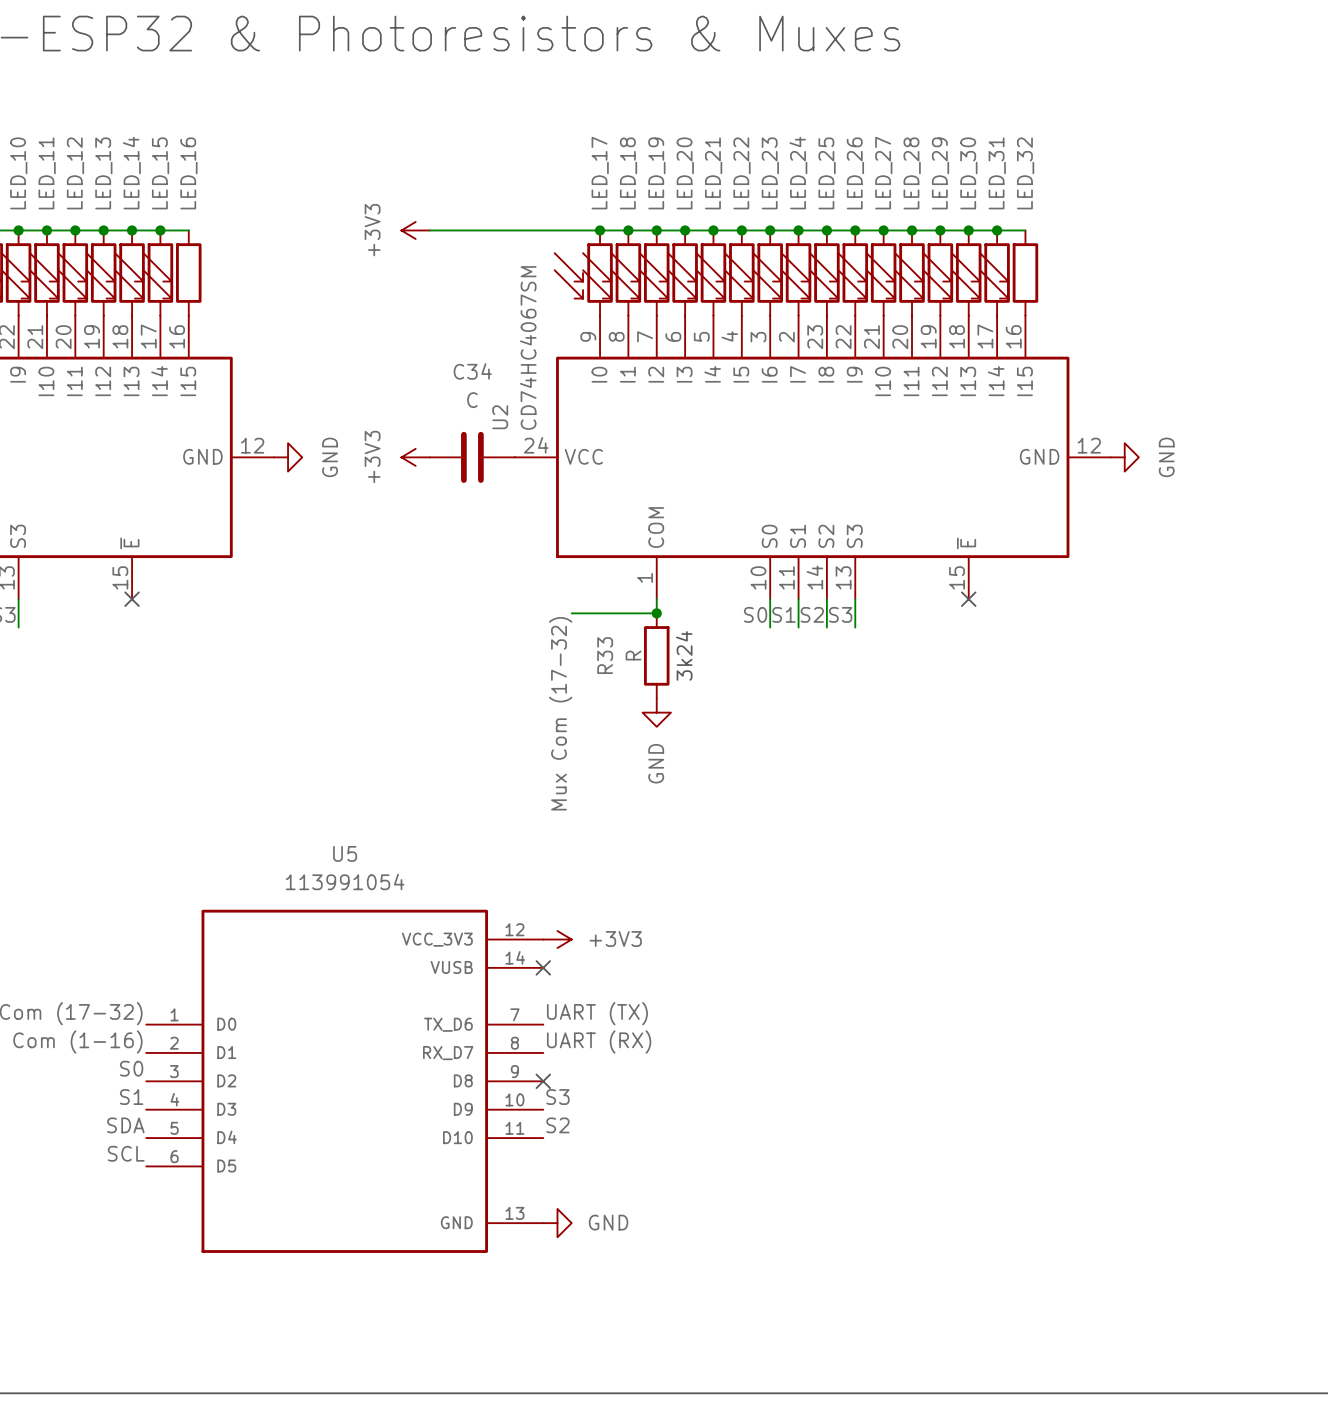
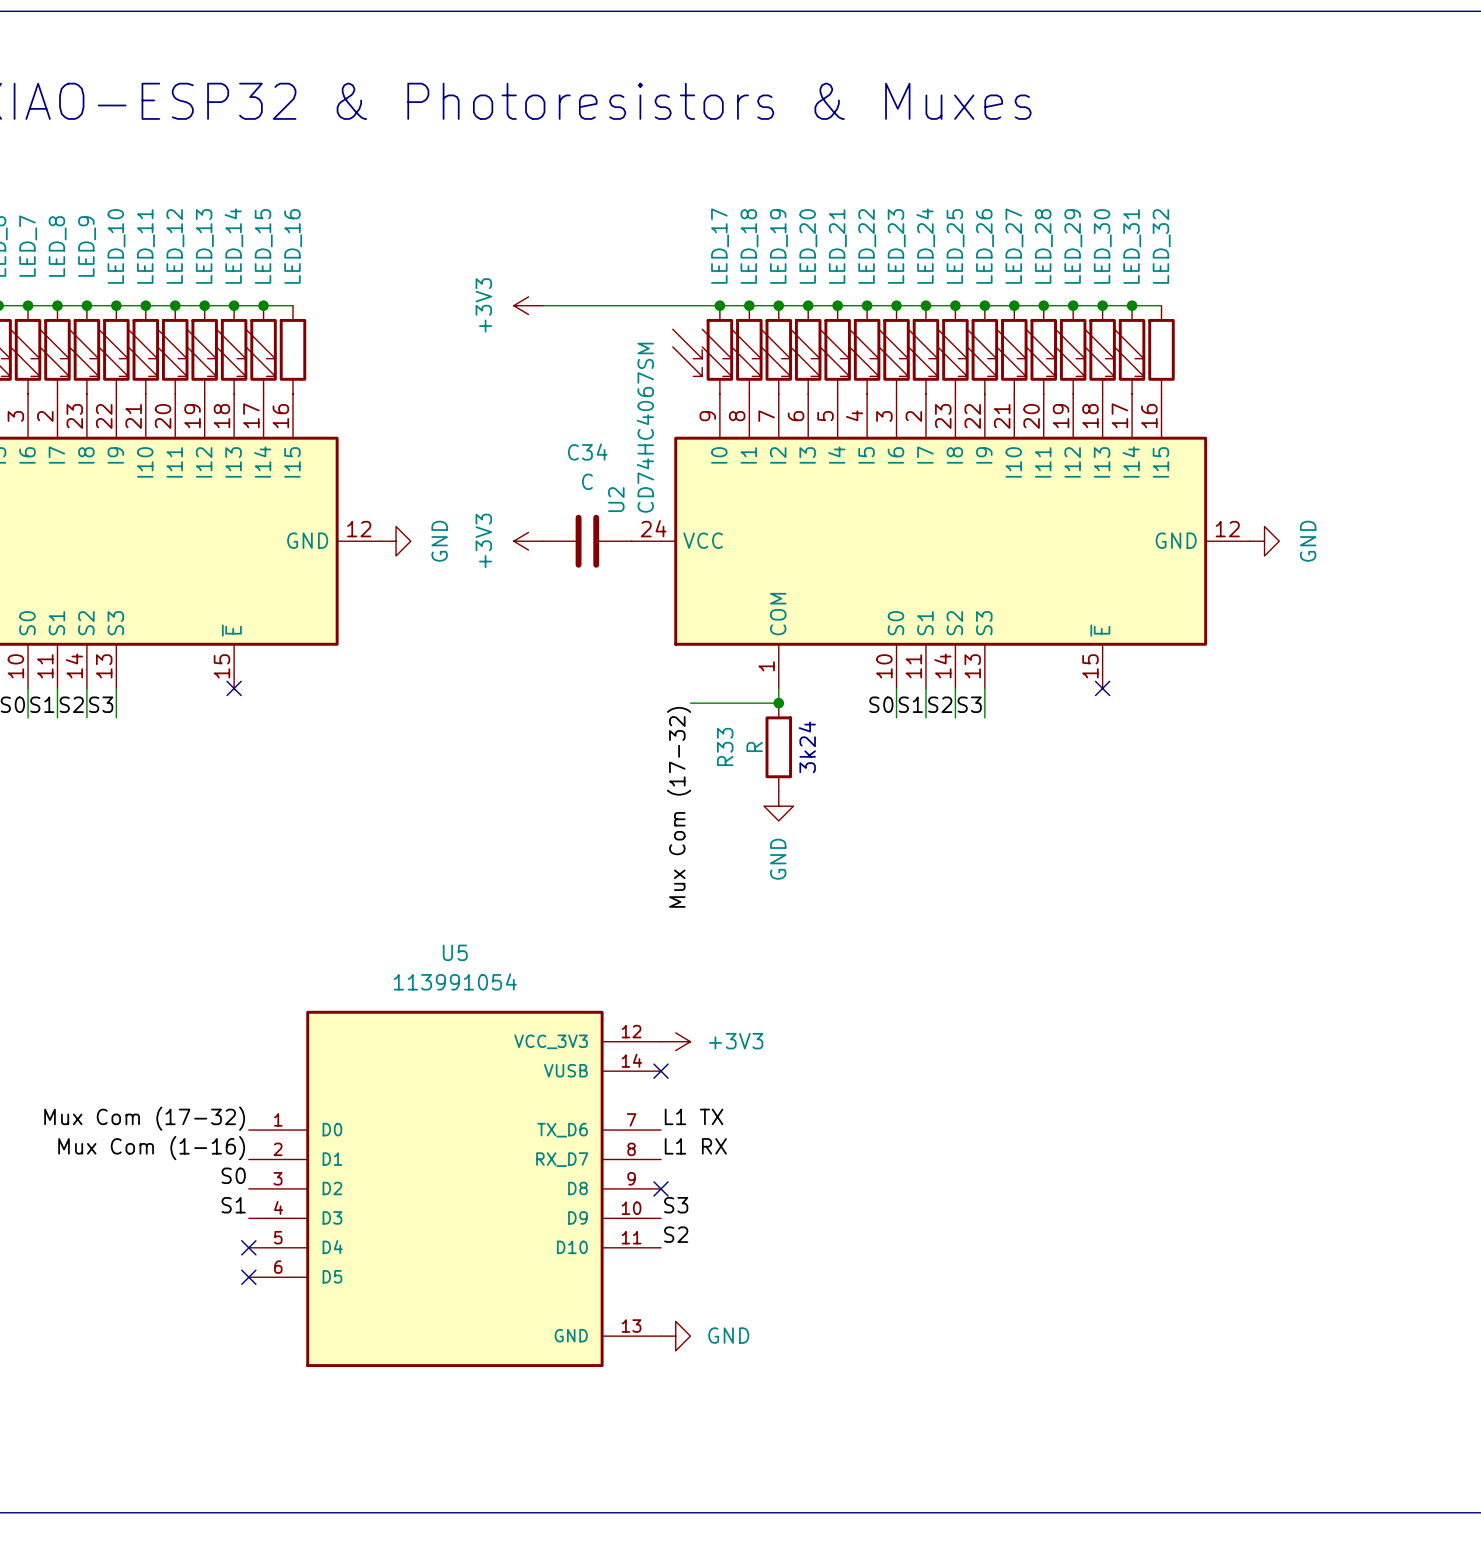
label: UART (TX) (597, 1013) -> L1 TX (694, 1116)
label: UART (RX) (599, 1042) -> L1 RX (695, 1146)
label: SDA (125, 1125) -> none
no-connect mark: none -> (248, 1247)
label: SCL (126, 1153) -> none
no-connect mark: none -> (248, 1277)

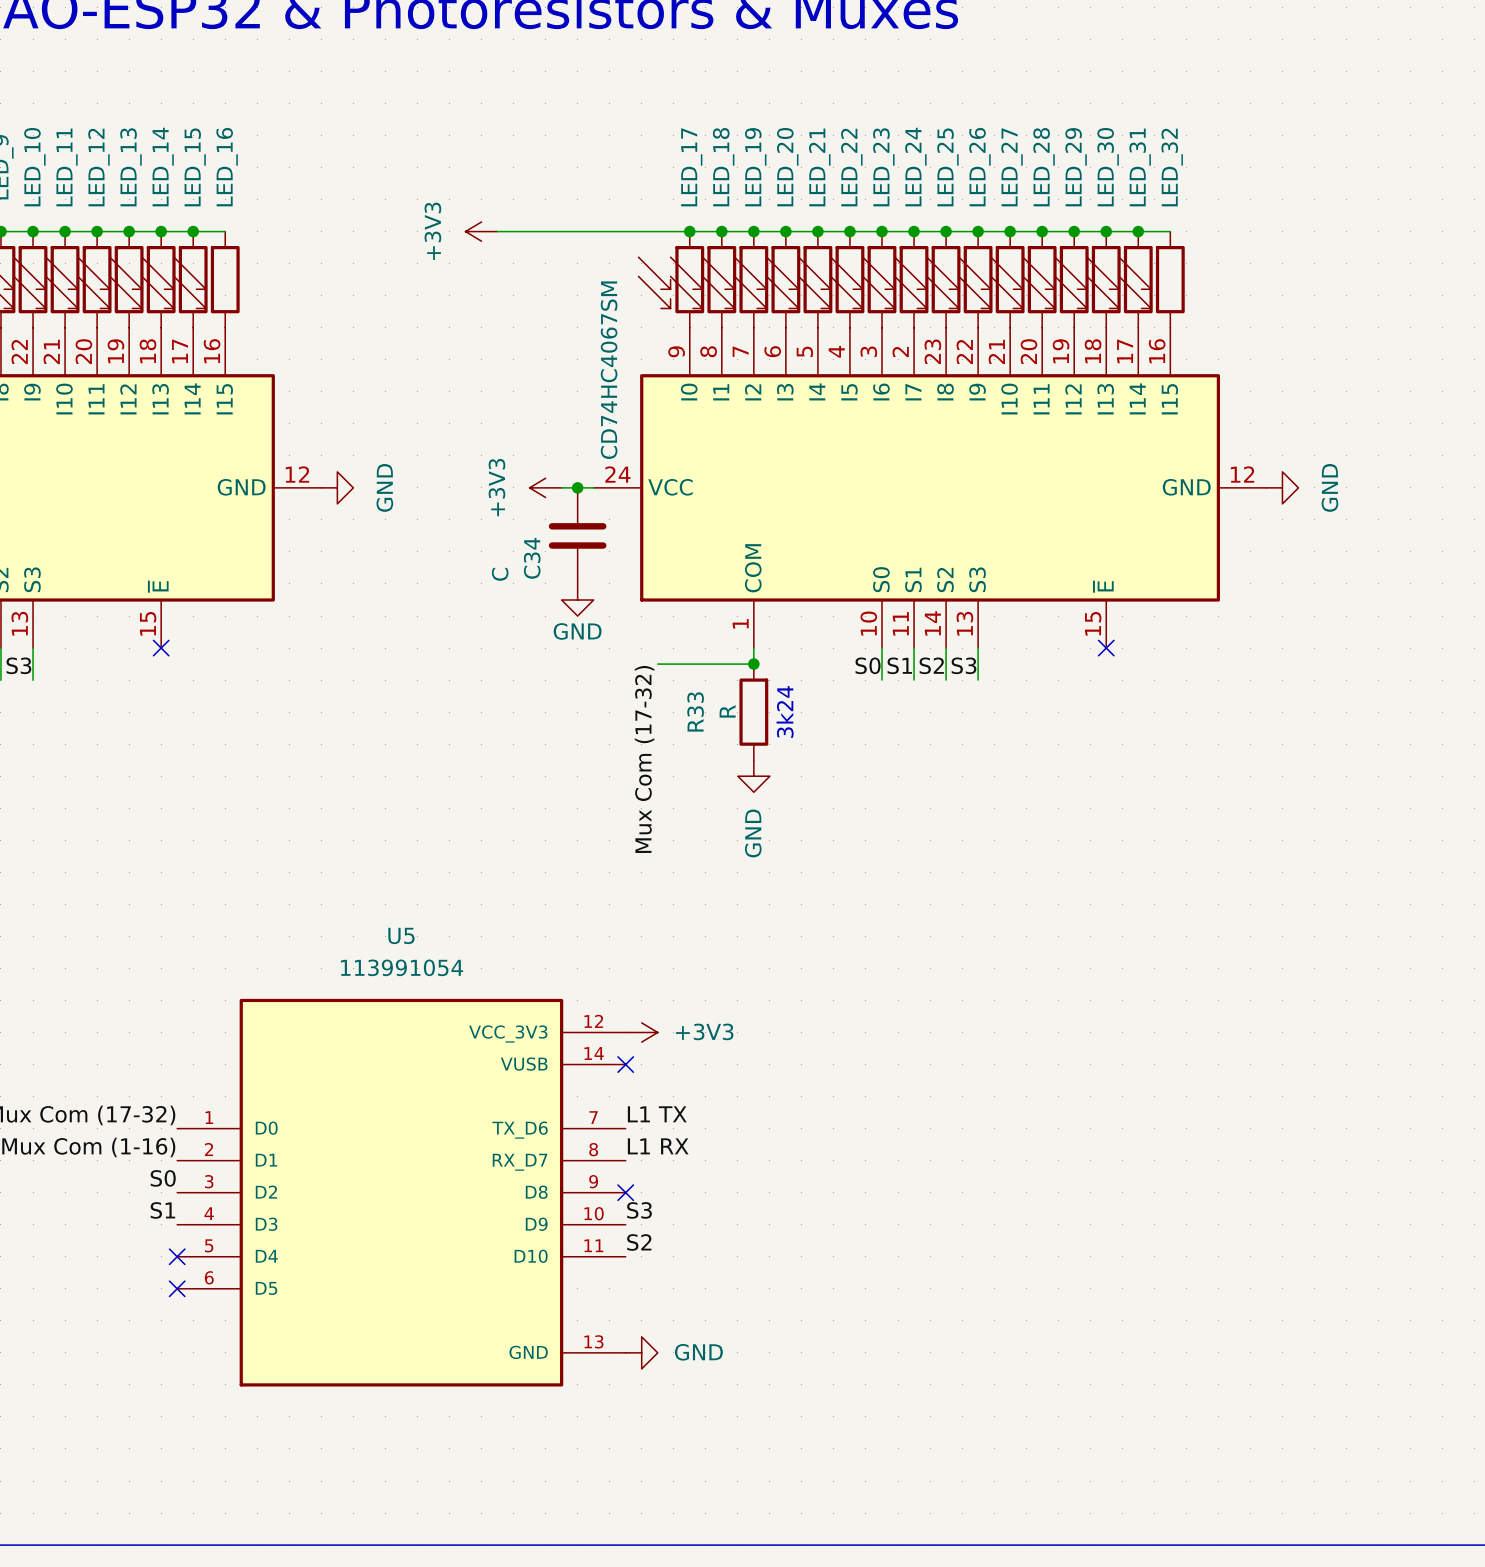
C34 name position: C34 (587, 452) -> C34 (532, 558)
C34 value position: C (587, 481) -> C (500, 574)
U2 name: U2 (616, 499) -> none
power symbol position: +3V3 (528, 541) -> +3V3 (545, 487)
C34 rotation: 0° (587, 541) -> 90° clockwise (577, 535)
C34 position: (587, 541) -> (577, 535)
junction: none -> (577, 487)
power symbol: none -> GND (577, 600)

